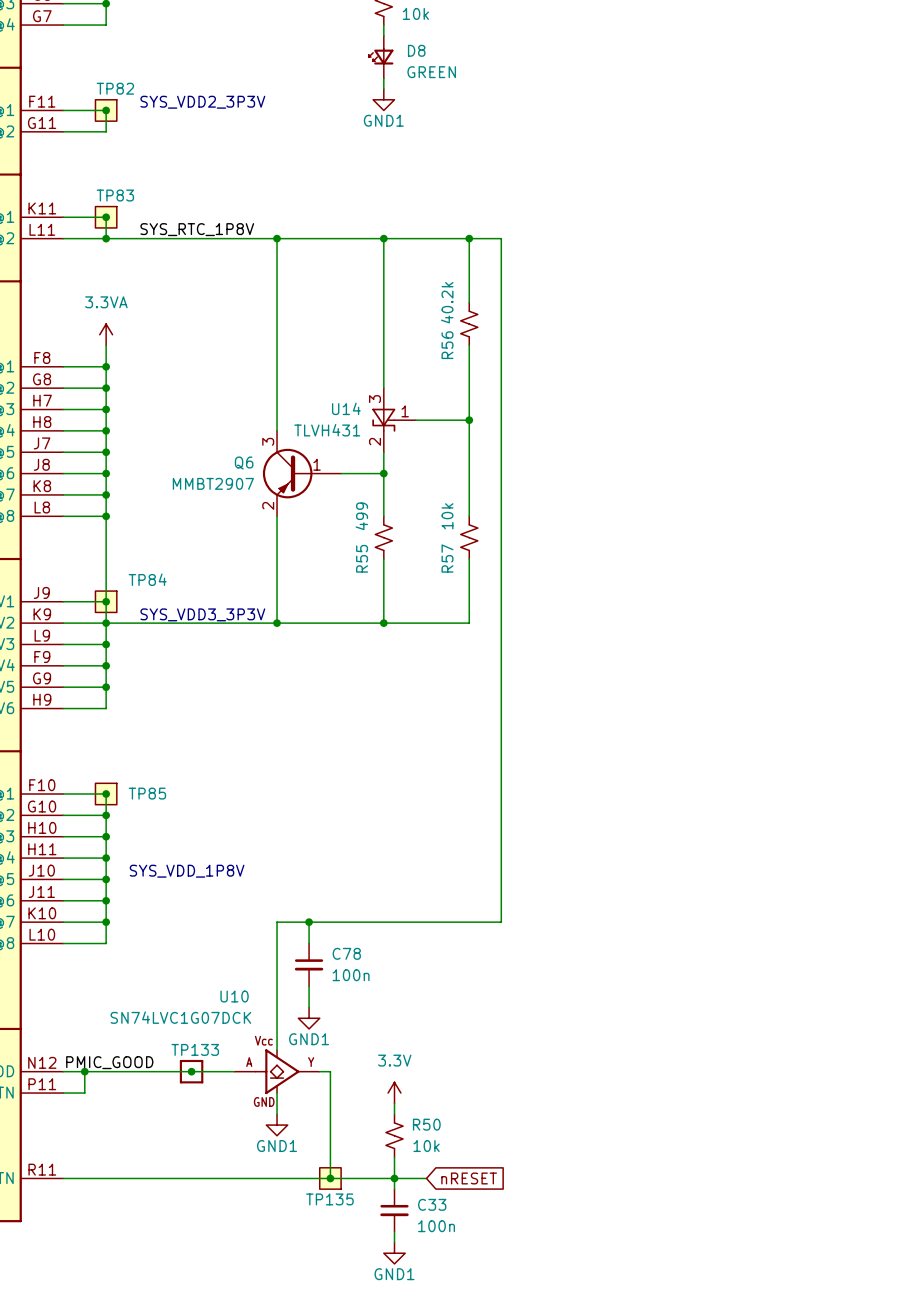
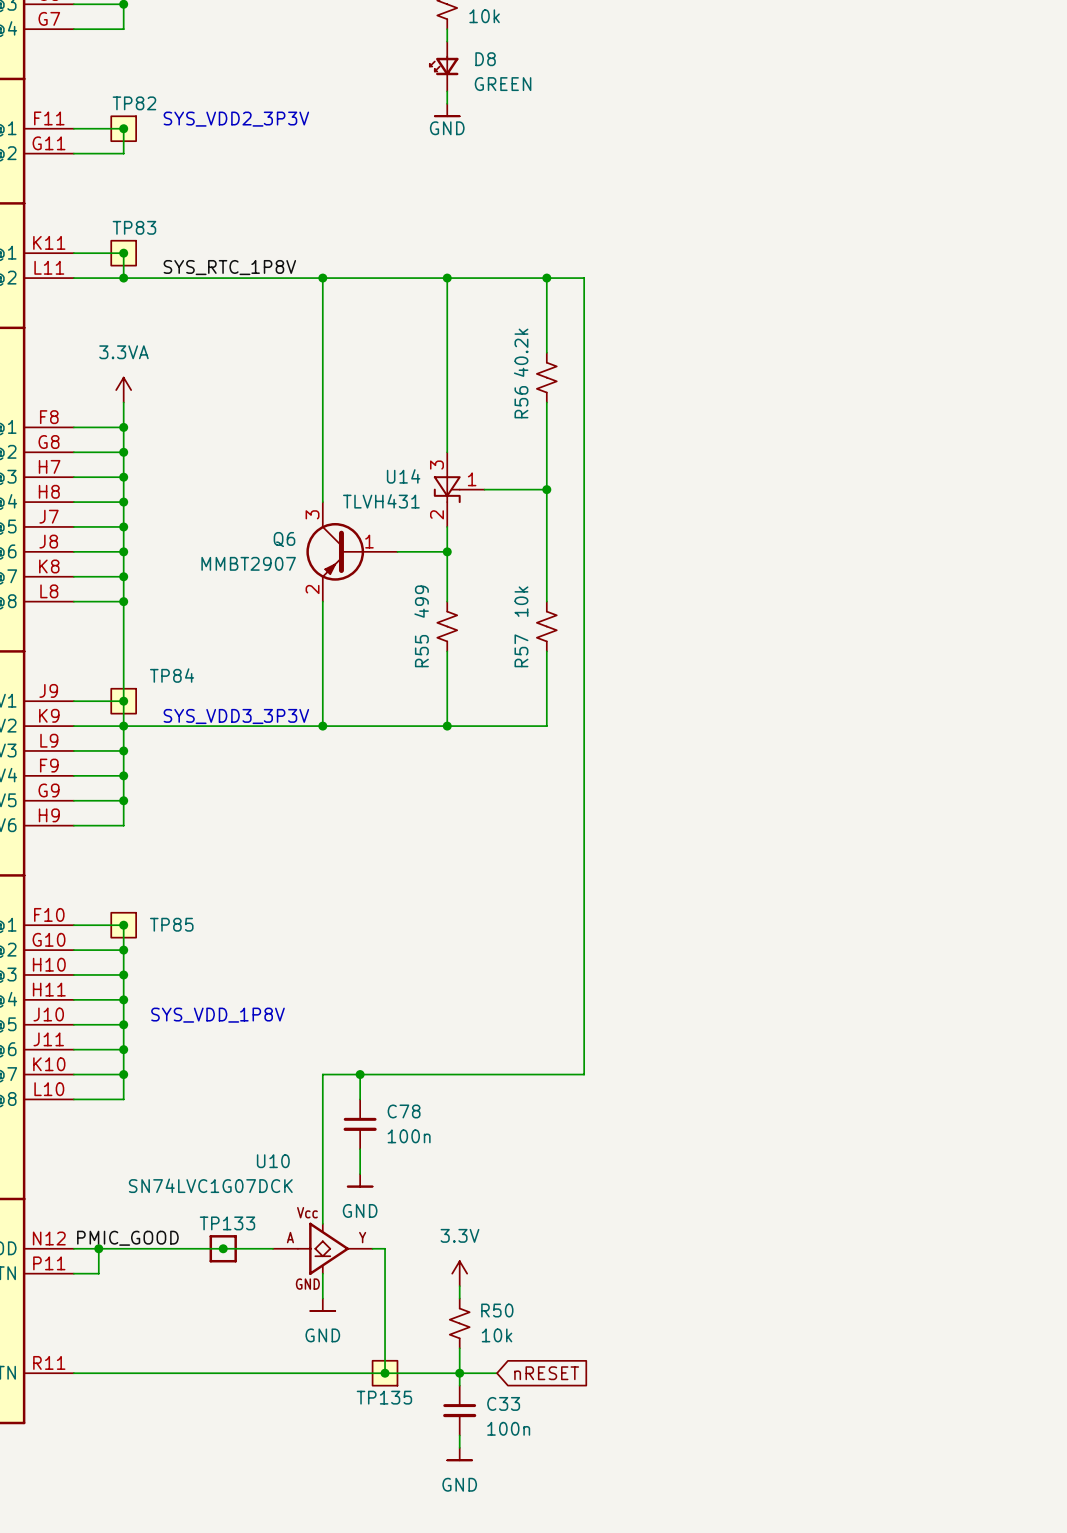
power symbol: GND1 (383, 99) -> GND (447, 110)
power symbol: GND1 (309, 1018) -> GND (360, 1180)
power symbol: GND1 (277, 1125) -> GND (322, 1304)
power symbol: GND1 (394, 1253) -> GND (459, 1454)

